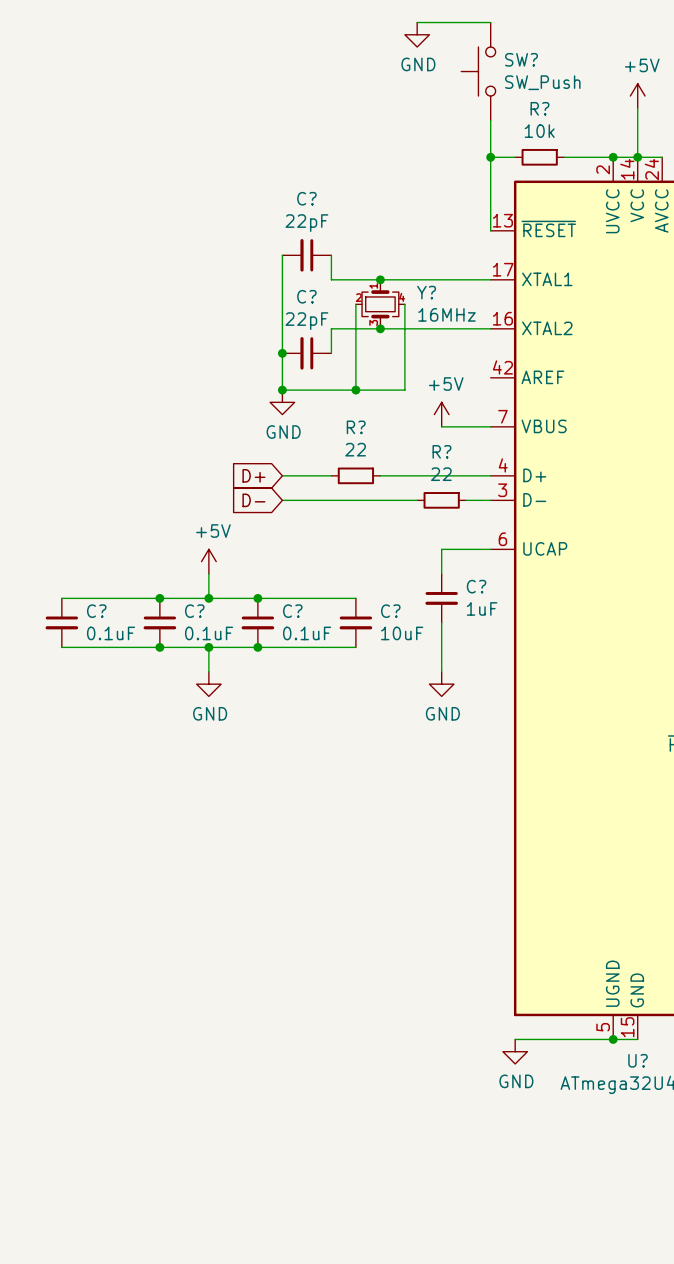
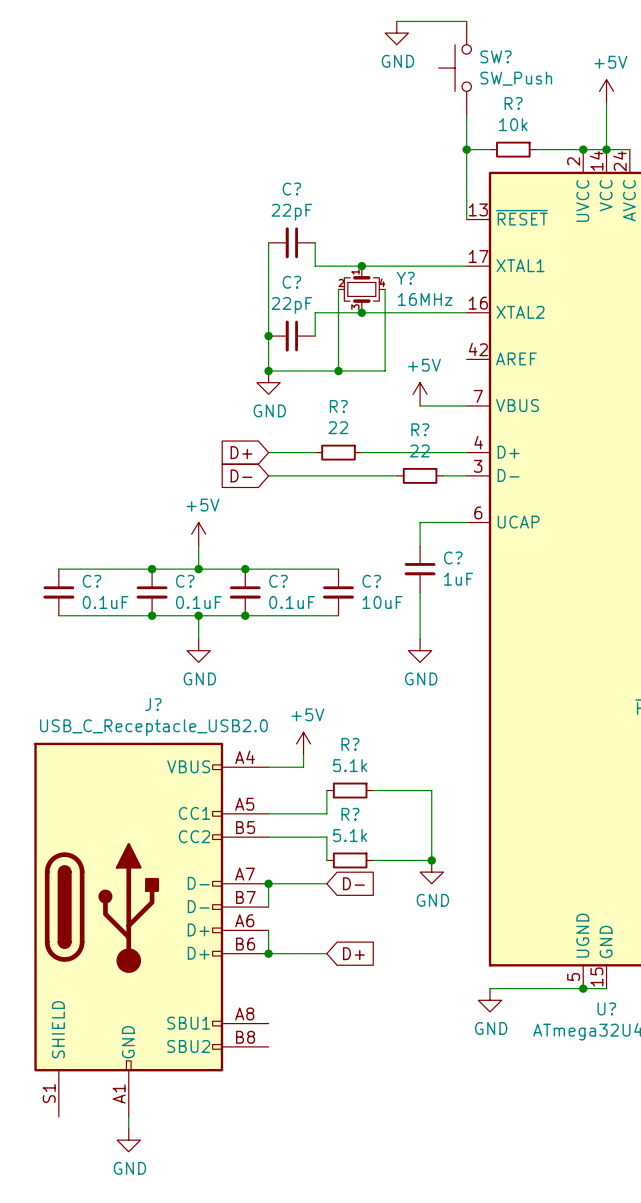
power symbol: none -> +5V (303, 743)
wire: none -> (303, 755) (303, 767) (268, 767)
wire: none -> (326, 790) (326, 813) (268, 813)
R?: none -> 5.1k (350, 790)
wire: none -> (373, 790) (431, 790) (431, 860) (373, 860)
wire: none -> (268, 837) (326, 837) (326, 860)
R?: none -> 5.1k (350, 860)
junction: none -> (431, 860)
power symbol: none -> GND (431, 872)
junction: none -> (268, 883)
wire: none -> (326, 883) (268, 883) (268, 907)
global label: none -> D- (353, 883)
J?: none -> USB_C_Receptacle_USB2.0 (151, 929)
wire: none -> (268, 930) (268, 953) (326, 953)
junction: none -> (268, 953)
global label: none -> D+ (353, 953)
wire: none -> (128, 1116) (128, 1128)
power symbol: none -> GND (128, 1140)

